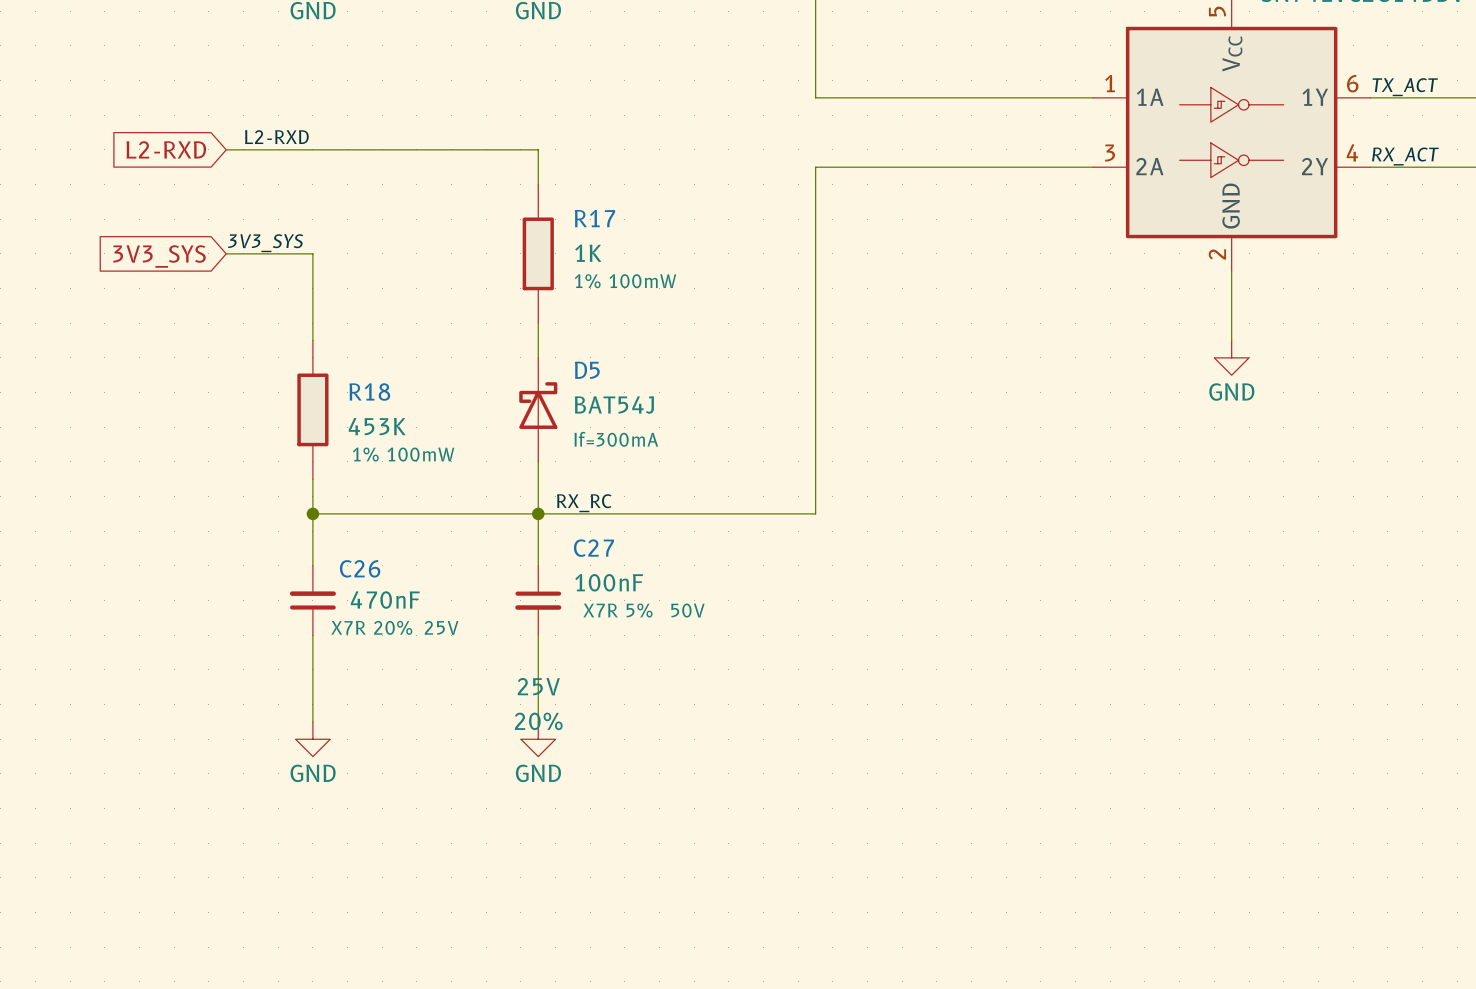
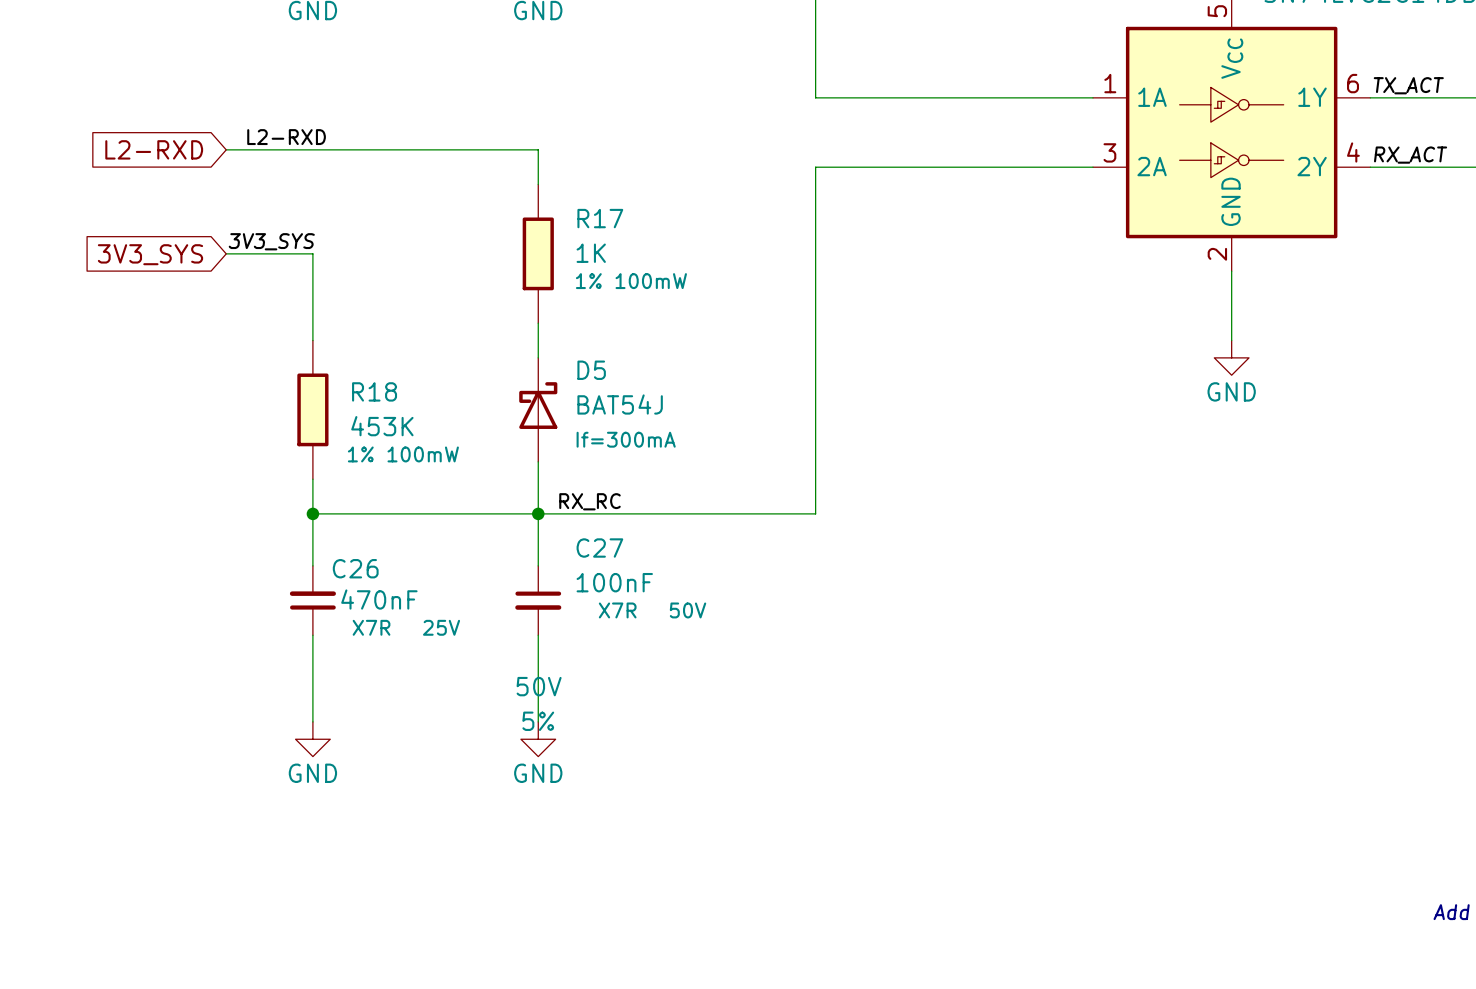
C27 text: X7R 5% (617, 610) -> X7R (617, 610)
C26 text: X7R 20% (371, 627) -> X7R (371, 627)
C27 text: 25V (538, 686) -> 50V (539, 686)
C27 text: 20% (538, 721) -> 5% (538, 721)

